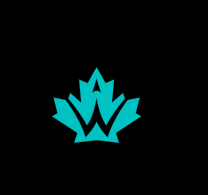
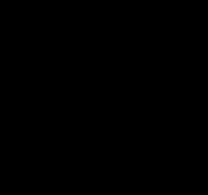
drawing: [52, 67, 142, 143] -> none

